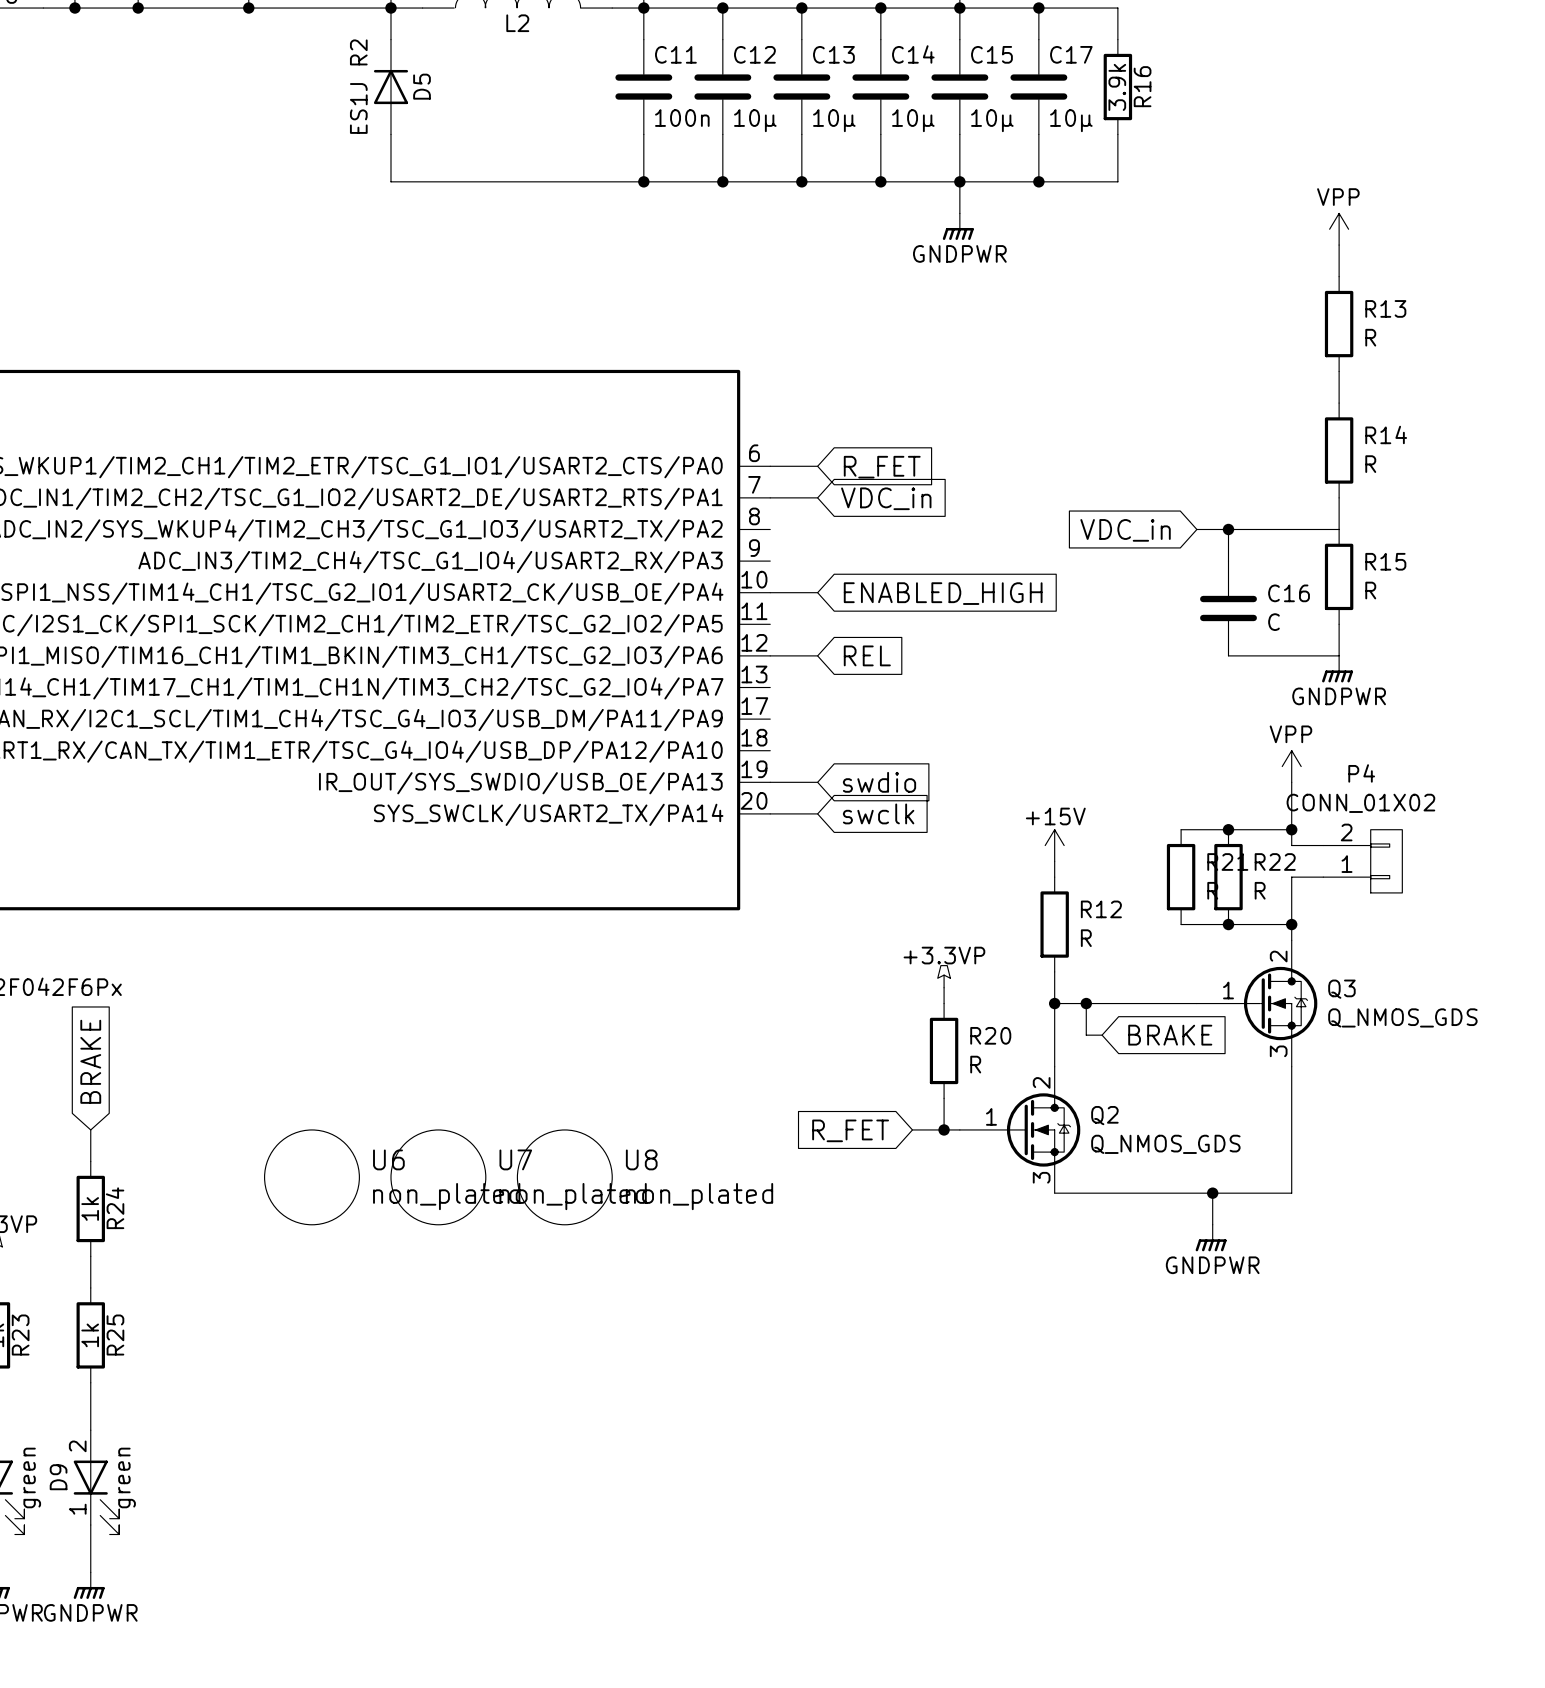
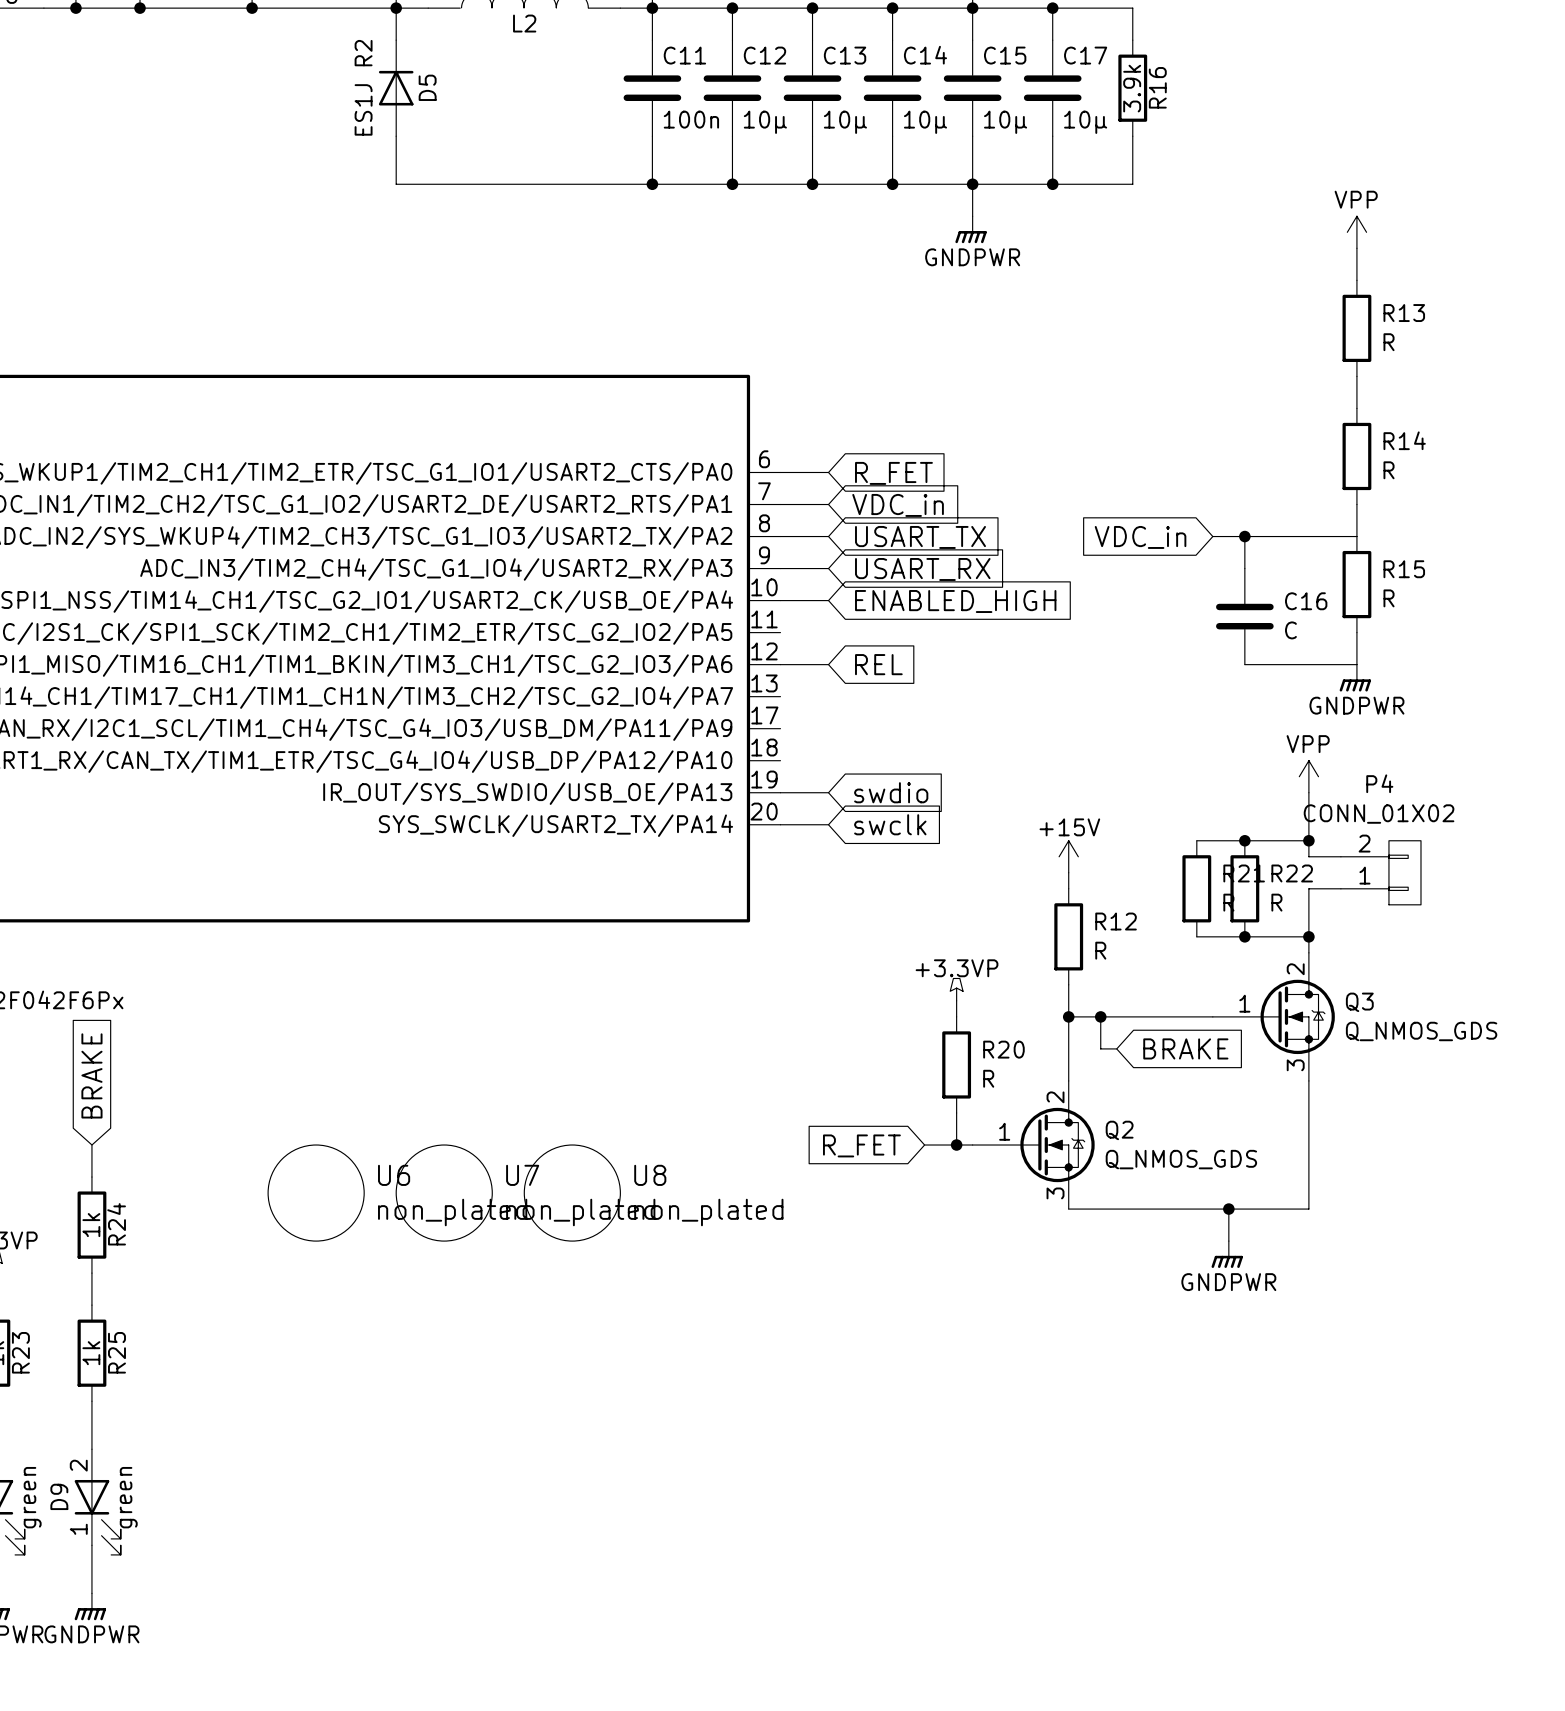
wire: none -> (780, 536) (828, 536)
global label: none -> USART_TX (920, 537)
wire: none -> (780, 568) (828, 568)
global label: none -> USART_RX (922, 569)

